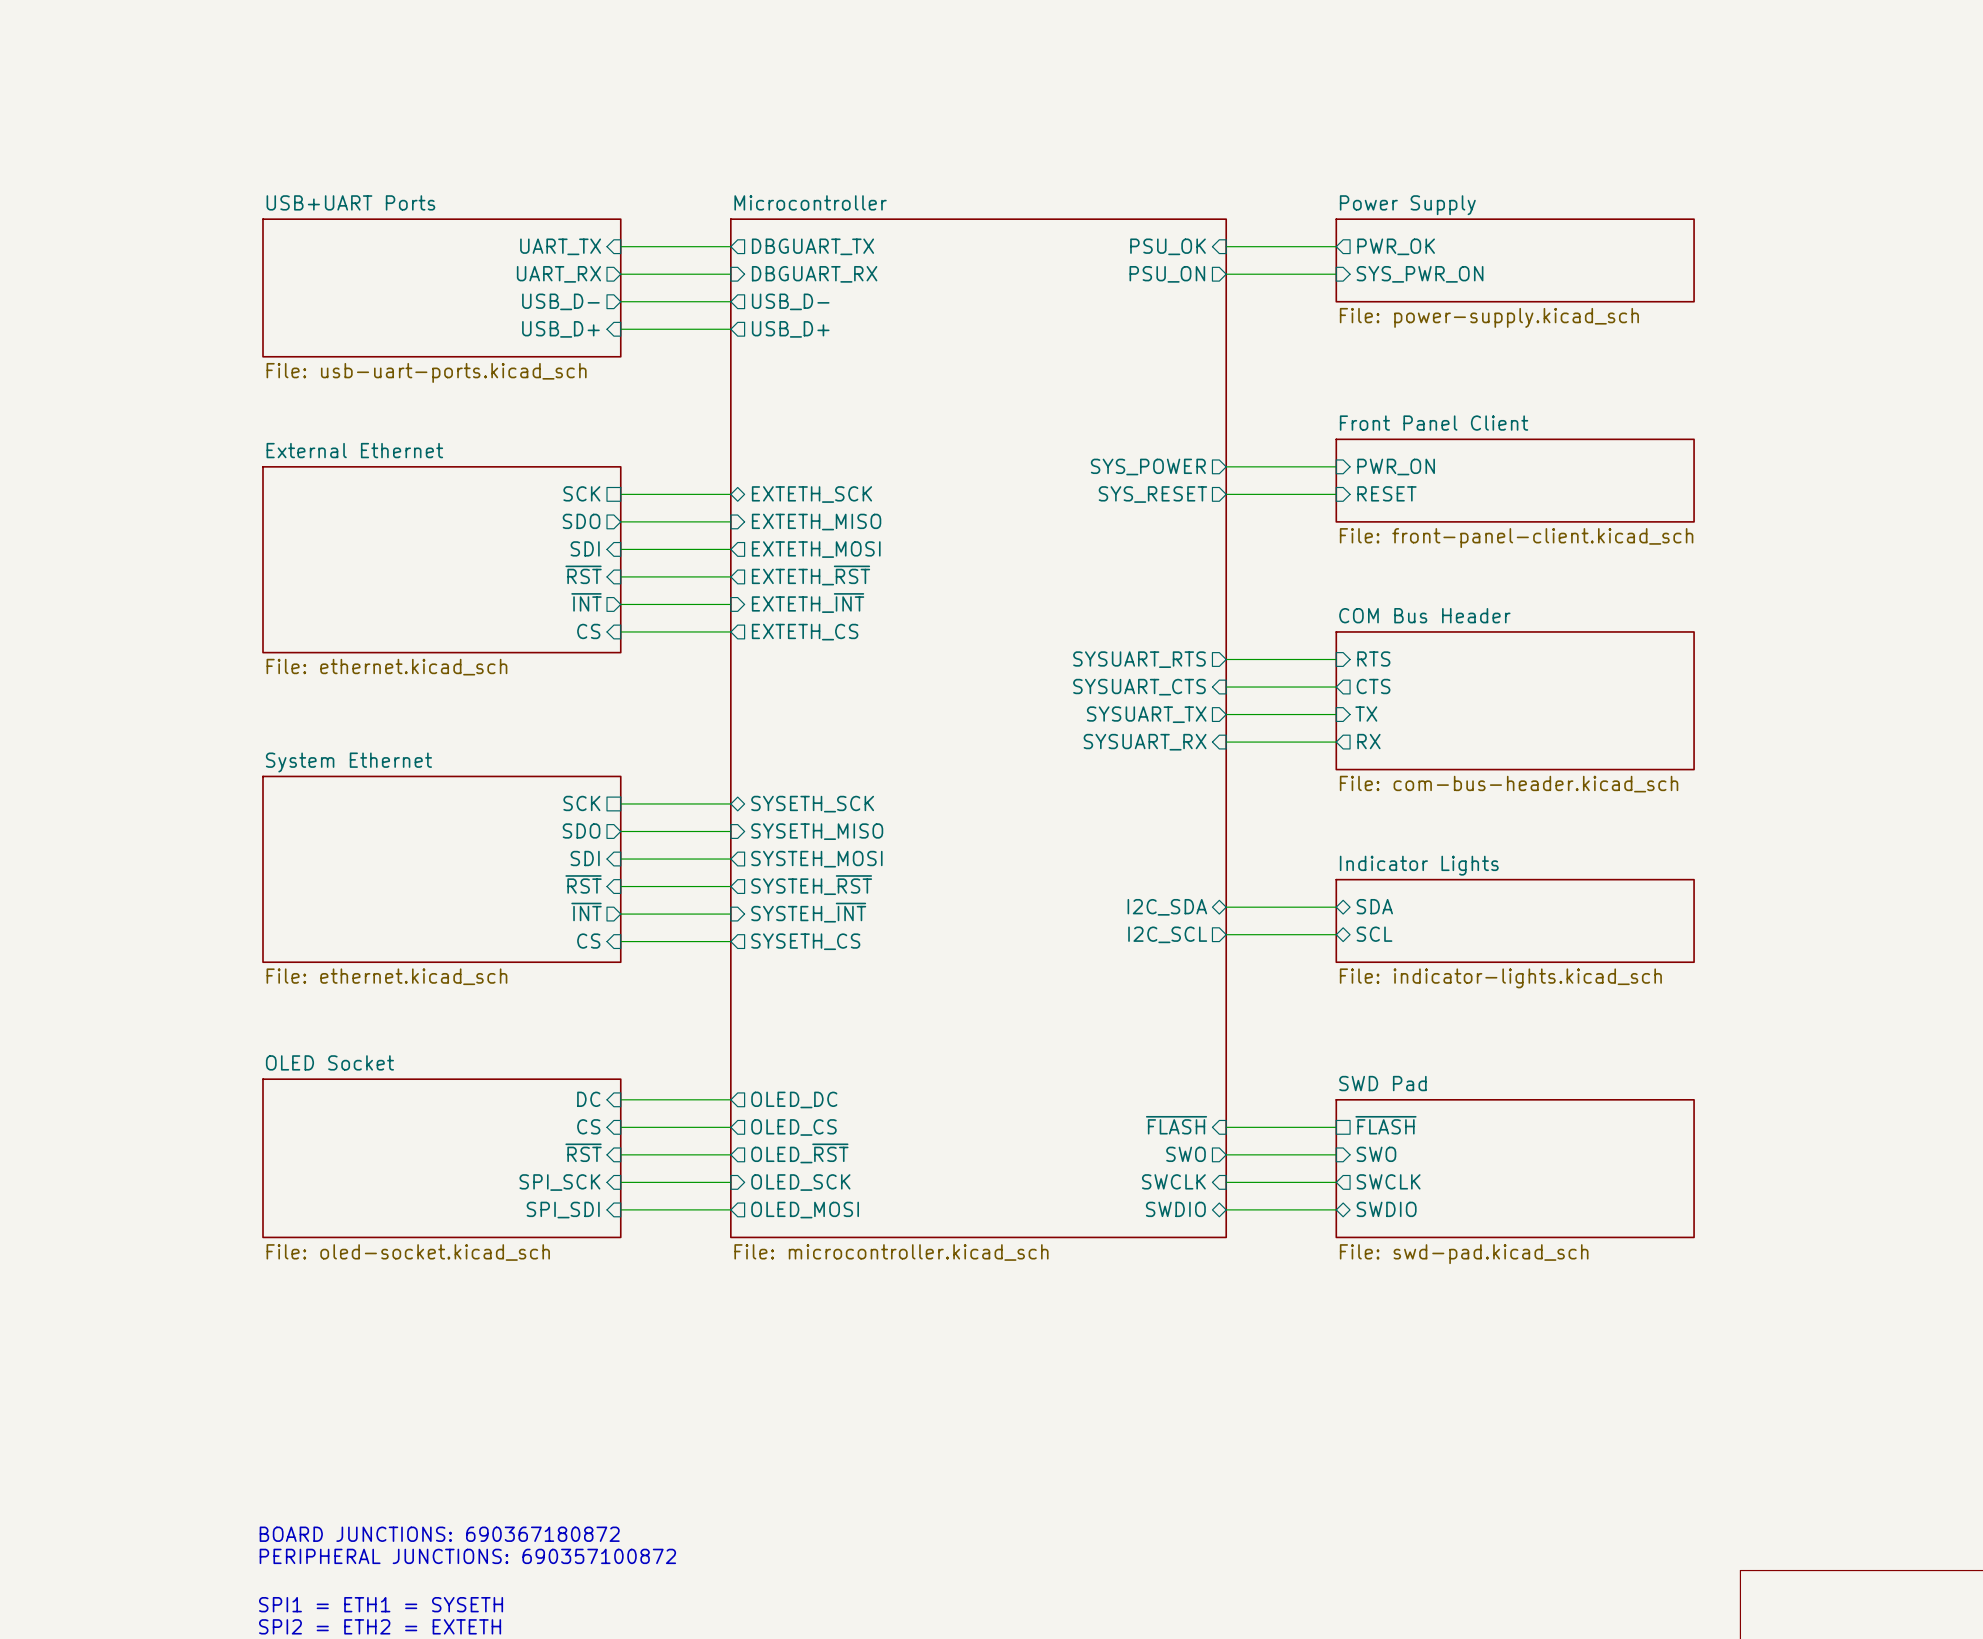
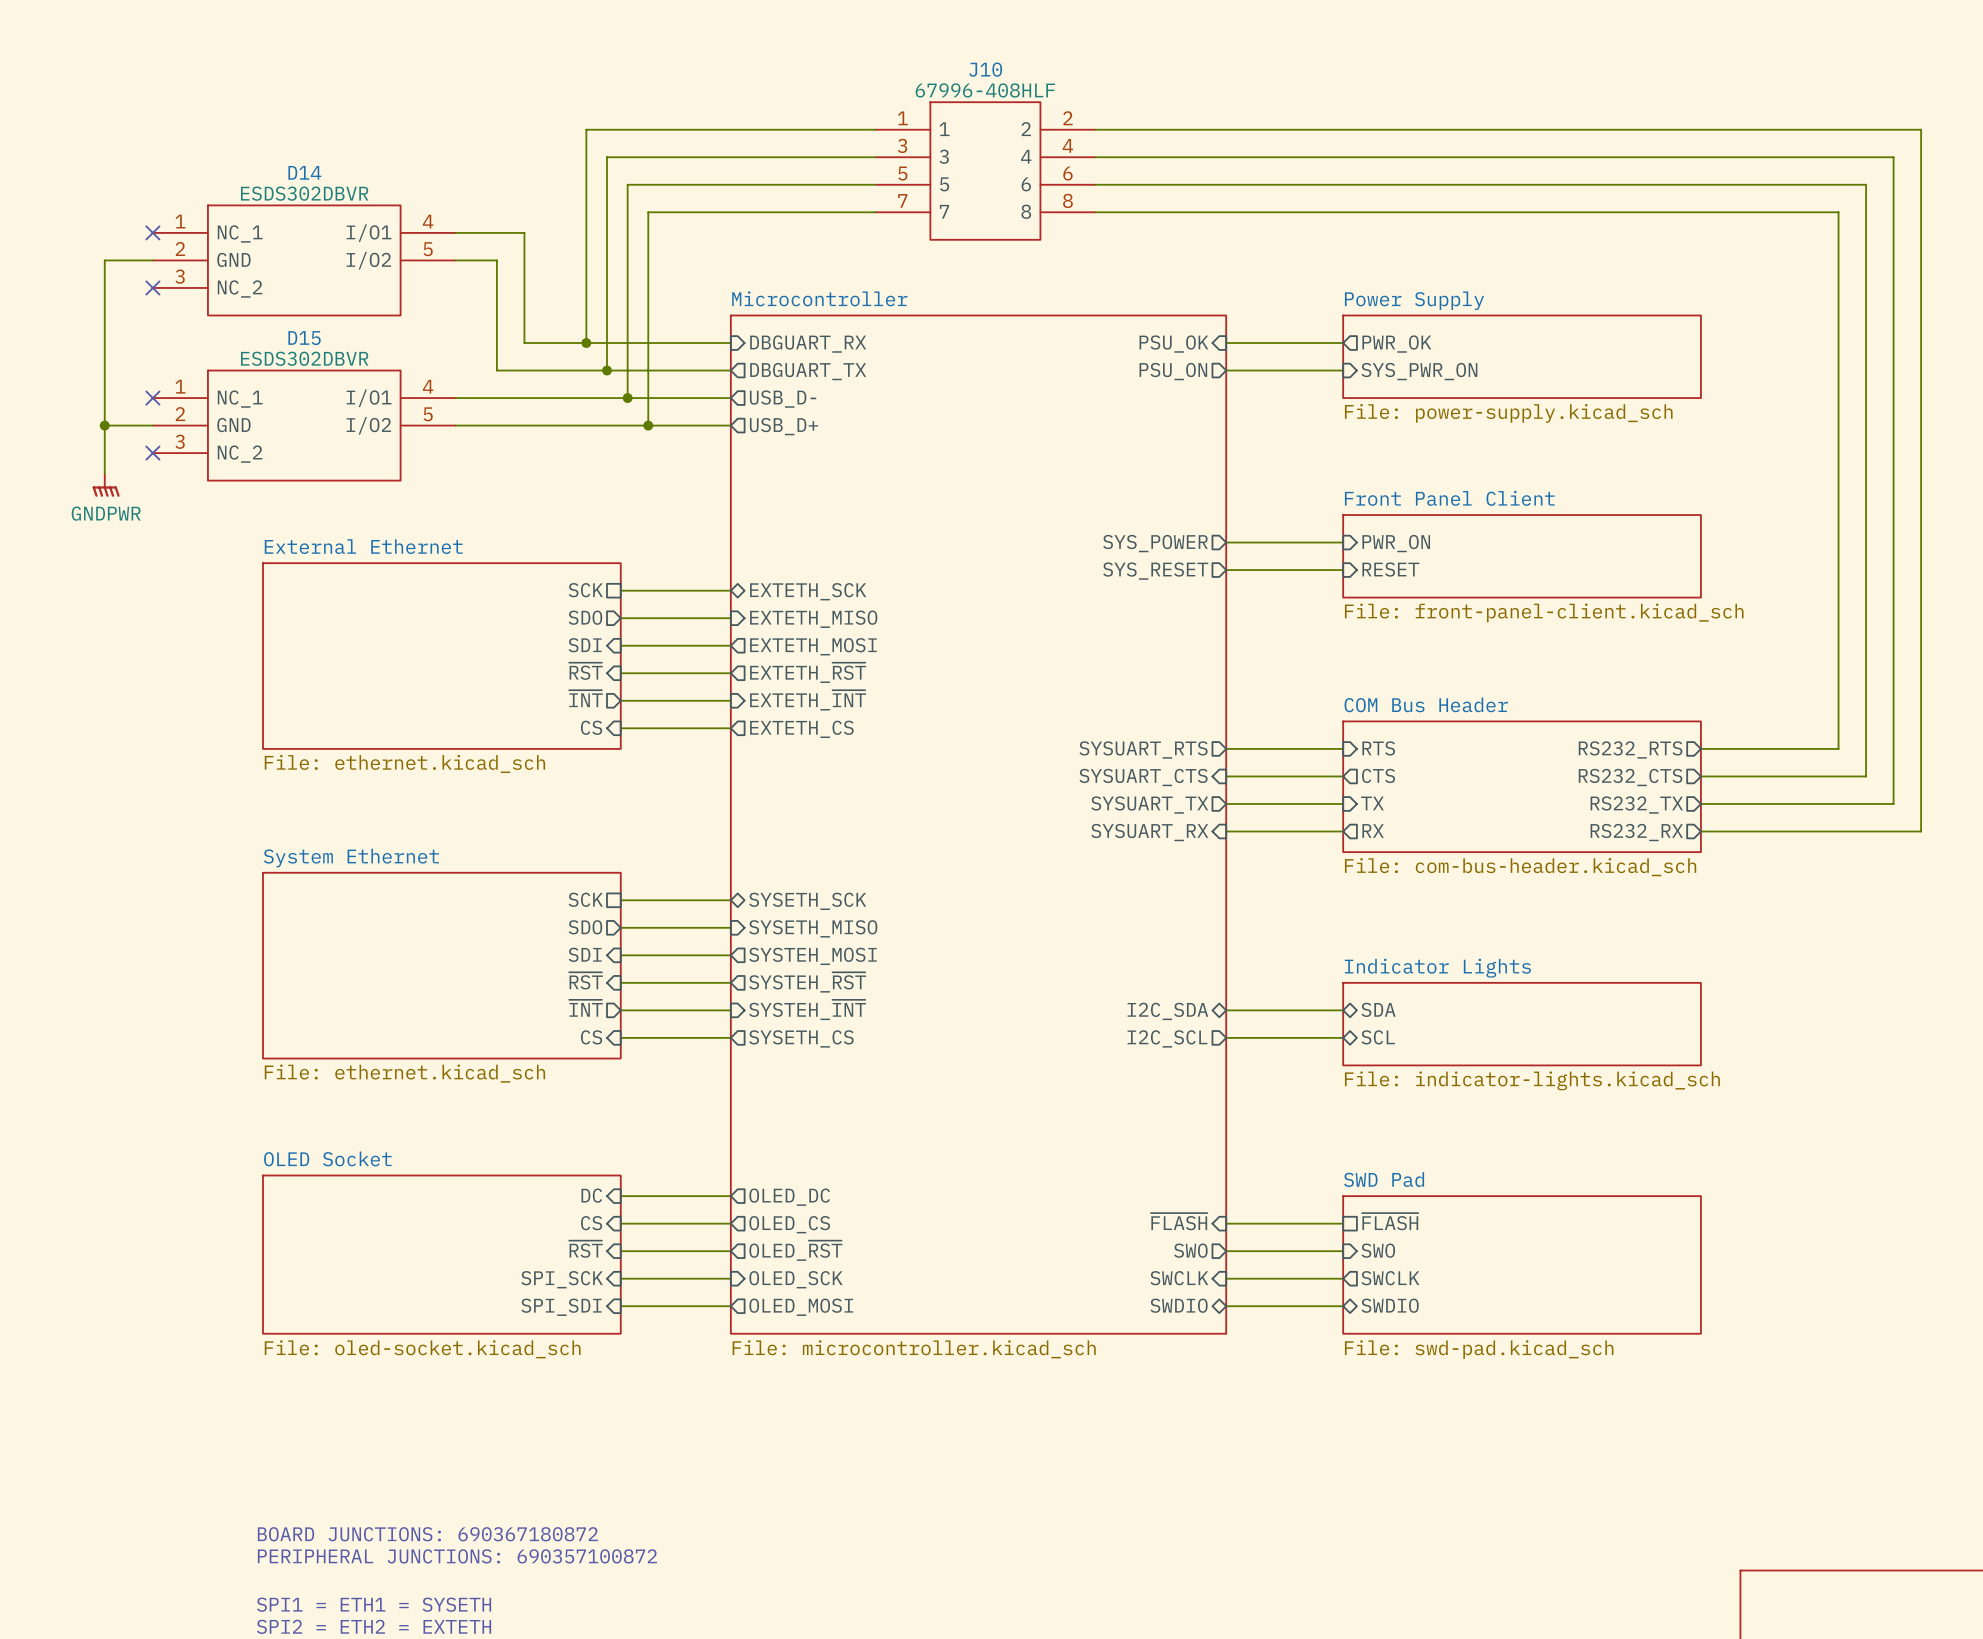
wire: none -> (875, 129) (586, 129) (586, 343)
wire: none -> (1095, 129) (1921, 129) (1921, 831) (1700, 831)
wire: none -> (875, 157) (607, 157) (607, 370)
wire: none -> (1095, 157) (1893, 157) (1893, 803) (1700, 803)
J10: none -> 67996-408HLF (985, 171)
wire: none -> (875, 184) (627, 184) (627, 398)
wire: none -> (1095, 184) (1866, 184) (1866, 776) (1700, 776)
wire: none -> (875, 212) (648, 212) (648, 425)
wire: none -> (1095, 212) (1838, 212) (1838, 748) (1700, 748)
no-connect mark: none -> (152, 232)
wire: none -> (455, 232) (524, 232) (524, 343) (730, 343)
sheet pin: UART_TX (560, 246) -> none
wire: (620, 246) (730, 246) -> none
sheet pin position: DBGUART_TX (812, 246) -> DBGUART_TX (808, 371)
sheet pin position: PSU_OK (1168, 246) -> PSU_OK (1173, 344)
wire: (1226, 246) (1336, 246) -> none
sheet pin position: PWR_OK (1396, 246) -> PWR_OK (1396, 344)
wire: none -> (152, 260) (104, 260) (104, 473)
D14: none -> ESDS302DBVR (304, 260)
wire: none -> (455, 260) (496, 260) (496, 370) (730, 370)
sheet Power Supply position: (1515, 260) -> (1522, 356)
sheet pin: UART_RX (558, 274) -> none
wire: (620, 274) (730, 274) -> none
sheet pin position: DBGUART_RX (814, 274) -> DBGUART_RX (808, 344)
sheet pin position: PSU_ON (1167, 274) -> PSU_ON (1173, 371)
wire: (1226, 274) (1336, 274) -> none
sheet pin position: SYS_PWR_ON (1420, 274) -> SYS_PWR_ON (1419, 371)
no-connect mark: none -> (152, 287)
sheet USB+UART Ports: File: usb-uart-ports.kicad_sch (441, 287) -> none
sheet pin: USB_D- (560, 301) -> none
wire: (620, 301) (730, 301) -> none
sheet pin: USB_D- (790, 301) -> none
sheet pin: USB_D+ (560, 329) -> none
wire: (620, 329) (730, 329) -> none
sheet pin: USB_D+ (790, 329) -> none
junction: none -> (586, 343)
wire: none -> (1226, 343) (1343, 343)
junction: none -> (607, 370)
wire: none -> (1226, 370) (1343, 370)
no-connect mark: none -> (152, 398)
wire: none -> (455, 398) (730, 398)
junction: none -> (627, 398)
sheet pin: none -> USB_D- (783, 399)
wire: none -> (104, 425) (152, 425)
junction: none -> (104, 425)
D15: none -> ESDS302DBVR (304, 425)
wire: none -> (455, 425) (730, 425)
junction: none -> (648, 425)
sheet pin: none -> USB_D+ (783, 426)
no-connect mark: none -> (152, 453)
sheet pin position: SYS_POWER (1148, 466) -> SYS_POWER (1155, 543)
wire: (1226, 466) (1336, 466) -> none
sheet pin position: PWR_ON (1396, 466) -> PWR_ON (1396, 543)
sheet Front Panel Client position: (1515, 480) -> (1522, 556)
power symbol: none -> GNDPWR (106, 485)
sheet pin position: SCK (581, 493) -> SCK (585, 590)
sheet pin position: RESET (1386, 493) -> RESET (1390, 569)
wire: (620, 494) (730, 494) -> (620, 590) (730, 590)
sheet pin position: EXTETH_SCK (811, 494) -> EXTETH_SCK (808, 591)
sheet pin position: SYS_RESET (1152, 494) -> SYS_RESET (1155, 571)
wire: (1226, 494) (1336, 494) -> none
sheet pin position: SDO (581, 521) -> SDO (585, 617)
wire: (620, 521) (730, 521) -> (620, 618) (730, 618)
sheet pin position: EXTETH_MISO (816, 522) -> EXTETH_MISO (813, 619)
wire: none -> (1226, 542) (1343, 542)
sheet pin position: SDI (585, 548) -> SDI (585, 645)
wire: (620, 549) (730, 549) -> (620, 645) (730, 645)
sheet pin position: EXTETH_MOSI (816, 549) -> EXTETH_MOSI (813, 646)
sheet External Ethernet position: (441, 559) -> (441, 656)
wire: none -> (1226, 570) (1343, 570)
sheet pin position: ~{RST} (583, 574) -> ~{RST} (585, 671)
sheet pin position: EXTETH_~{RST} (810, 575) -> EXTETH_~{RST} (808, 672)
wire: (620, 576) (730, 576) -> (620, 673) (730, 673)
sheet pin position: ~{INT} (586, 602) -> ~{INT} (585, 698)
sheet pin position: EXTETH_~{INT} (808, 603) -> EXTETH_~{INT} (808, 700)
wire: (620, 604) (730, 604) -> (620, 700) (730, 700)
sheet pin position: CS (588, 631) -> CS (591, 727)
wire: (620, 631) (730, 631) -> (620, 728) (730, 728)
sheet pin position: EXTETH_CS (805, 632) -> EXTETH_CS (801, 729)
sheet pin position: RTS (1373, 658) -> RTS (1378, 748)
sheet pin position: SYSUART_RTS (1139, 659) -> SYSUART_RTS (1143, 749)
wire: (1226, 659) (1336, 659) -> none
sheet pin position: CTS (1373, 686) -> CTS (1378, 775)
sheet pin position: SYSUART_CTS (1139, 687) -> SYSUART_CTS (1143, 777)
wire: (1226, 687) (1336, 687) -> none
sheet COM Bus Header: File: com-bus-header.kicad_sch (1515, 700) -> none
sheet pin position: SYSUART_TX (1146, 714) -> SYSUART_TX (1149, 805)
wire: (1226, 714) (1336, 714) -> none
sheet pin position: TX (1366, 714) -> TX (1372, 803)
sheet Microcontroller position: (978, 728) -> (978, 824)
sheet pin position: RX (1368, 741) -> RX (1373, 830)
sheet pin position: SYSUART_RX (1145, 742) -> SYSUART_RX (1149, 832)
wire: (1226, 742) (1336, 742) -> none
wire: none -> (1226, 748) (1343, 748)
sheet pin: none -> RS232_RTS (1630, 749)
wire: none -> (1226, 776) (1343, 776)
sheet pin: none -> RS232_CTS (1630, 777)
sheet COM Bus Header: none -> File: com-bus-header.kicad_sch (1522, 786)
sheet pin position: SCK (581, 803) -> SCK (585, 899)
wire: (620, 803) (730, 803) -> (620, 900) (730, 900)
wire: none -> (1226, 803) (1343, 803)
sheet pin position: SYSETH_SCK (812, 804) -> SYSETH_SCK (807, 901)
sheet pin: none -> RS232_TX (1636, 805)
sheet pin position: SDO (581, 830) -> SDO (585, 927)
wire: (620, 831) (730, 831) -> (620, 927) (730, 927)
sheet pin position: SYSETH_MISO (817, 831) -> SYSETH_MISO (813, 928)
wire: none -> (1226, 831) (1343, 831)
sheet pin: none -> RS232_RX (1636, 832)
sheet pin position: SDI (585, 858) -> SDI (585, 954)
wire: (620, 859) (730, 859) -> (620, 955) (730, 955)
sheet pin position: SYSTEH_MOSI (816, 859) -> SYSTEH_MOSI (812, 956)
sheet System Ethernet position: (441, 869) -> (441, 965)
sheet pin: ~{RST} (583, 884) -> none
sheet pin position: SYSTEH_~{RST} (811, 885) -> SYSTEH_~{RST} (807, 982)
wire: (620, 886) (730, 886) -> (620, 982) (730, 982)
sheet pin position: SDA (1374, 906) -> SDA (1378, 1009)
sheet pin position: I2C_SDA (1167, 907) -> I2C_SDA (1167, 1011)
wire: (1226, 907) (1336, 907) -> none
sheet pin position: ~{INT} (586, 911) -> ~{INT} (585, 1008)
sheet pin position: SYSTEH_~{INT} (808, 912) -> SYSTEH_~{INT} (807, 1009)
wire: (620, 914) (730, 914) -> (620, 1010) (730, 1010)
sheet Indicator Lights position: (1515, 920) -> (1522, 1024)
sheet pin position: I2C_SCL (1167, 934) -> I2C_SCL (1167, 1038)
wire: (1226, 934) (1336, 934) -> none
sheet pin position: SCL (1374, 934) -> SCL (1378, 1037)
sheet pin: CS (588, 941) -> none
wire: (620, 941) (730, 941) -> (620, 1037) (730, 1037)
sheet pin position: SYSETH_CS (805, 941) -> SYSETH_CS (801, 1038)
sheet pin: none -> ~{RST} (585, 980)
wire: none -> (1226, 1010) (1343, 1010)
sheet pin: none -> CS (591, 1037)
wire: none -> (1226, 1037) (1343, 1037)
sheet pin position: DC (588, 1099) -> DC (591, 1195)
wire: (620, 1099) (730, 1099) -> (620, 1196) (730, 1196)
sheet pin position: OLED_DC (794, 1099) -> OLED_DC (789, 1197)
sheet pin: ~{FLASH} (1176, 1125) -> none
sheet pin: ~{FLASH} (1385, 1125) -> none
sheet pin: CS (588, 1126) -> none
wire: (620, 1127) (730, 1127) -> (620, 1223) (730, 1223)
sheet pin position: OLED_CS (793, 1127) -> OLED_CS (789, 1224)
wire: (1226, 1127) (1336, 1127) -> none
sheet pin: ~{RST} (583, 1152) -> none
sheet pin position: OLED_~{RST} (799, 1153) -> OLED_~{RST} (795, 1250)
wire: (620, 1154) (730, 1154) -> (620, 1251) (730, 1251)
sheet pin: SWO (1186, 1154) -> none
wire: (1226, 1154) (1336, 1154) -> none
sheet pin: SWO (1376, 1154) -> none
sheet OLED Socket position: (441, 1158) -> (441, 1254)
sheet SWD Pad position: (1515, 1168) -> (1522, 1264)
sheet pin: SWCLK (1173, 1181) -> none
sheet pin: SWCLK (1388, 1181) -> none
sheet pin position: SPI_SCK (559, 1182) -> SPI_SCK (562, 1279)
wire: (620, 1182) (730, 1182) -> (620, 1278) (730, 1278)
sheet pin position: OLED_SCK (800, 1182) -> OLED_SCK (795, 1279)
wire: (1226, 1182) (1336, 1182) -> none
wire: (620, 1209) (730, 1209) -> (620, 1306) (730, 1306)
sheet pin: SWDIO (1175, 1209) -> none
wire: (1226, 1209) (1336, 1209) -> none
sheet pin: SWDIO (1386, 1209) -> none
sheet pin position: SPI_SDI (563, 1210) -> SPI_SDI (561, 1307)
sheet pin position: OLED_MOSI (805, 1210) -> OLED_MOSI (801, 1307)
sheet pin: none -> ~{FLASH} (1179, 1221)
sheet pin: none -> ~{FLASH} (1390, 1221)
sheet pin: none -> CS (591, 1223)
wire: none -> (1226, 1223) (1343, 1223)
sheet pin: none -> ~{RST} (585, 1249)
sheet pin: none -> SWO (1190, 1250)
sheet pin: none -> SWO (1378, 1250)
wire: none -> (1226, 1251) (1343, 1251)
sheet pin: none -> SWCLK (1179, 1278)
wire: none -> (1226, 1278) (1343, 1278)
sheet pin: none -> SWCLK (1390, 1278)
sheet pin: none -> SWDIO (1179, 1305)
sheet pin: none -> SWDIO (1390, 1305)
wire: none -> (1226, 1306) (1343, 1306)

